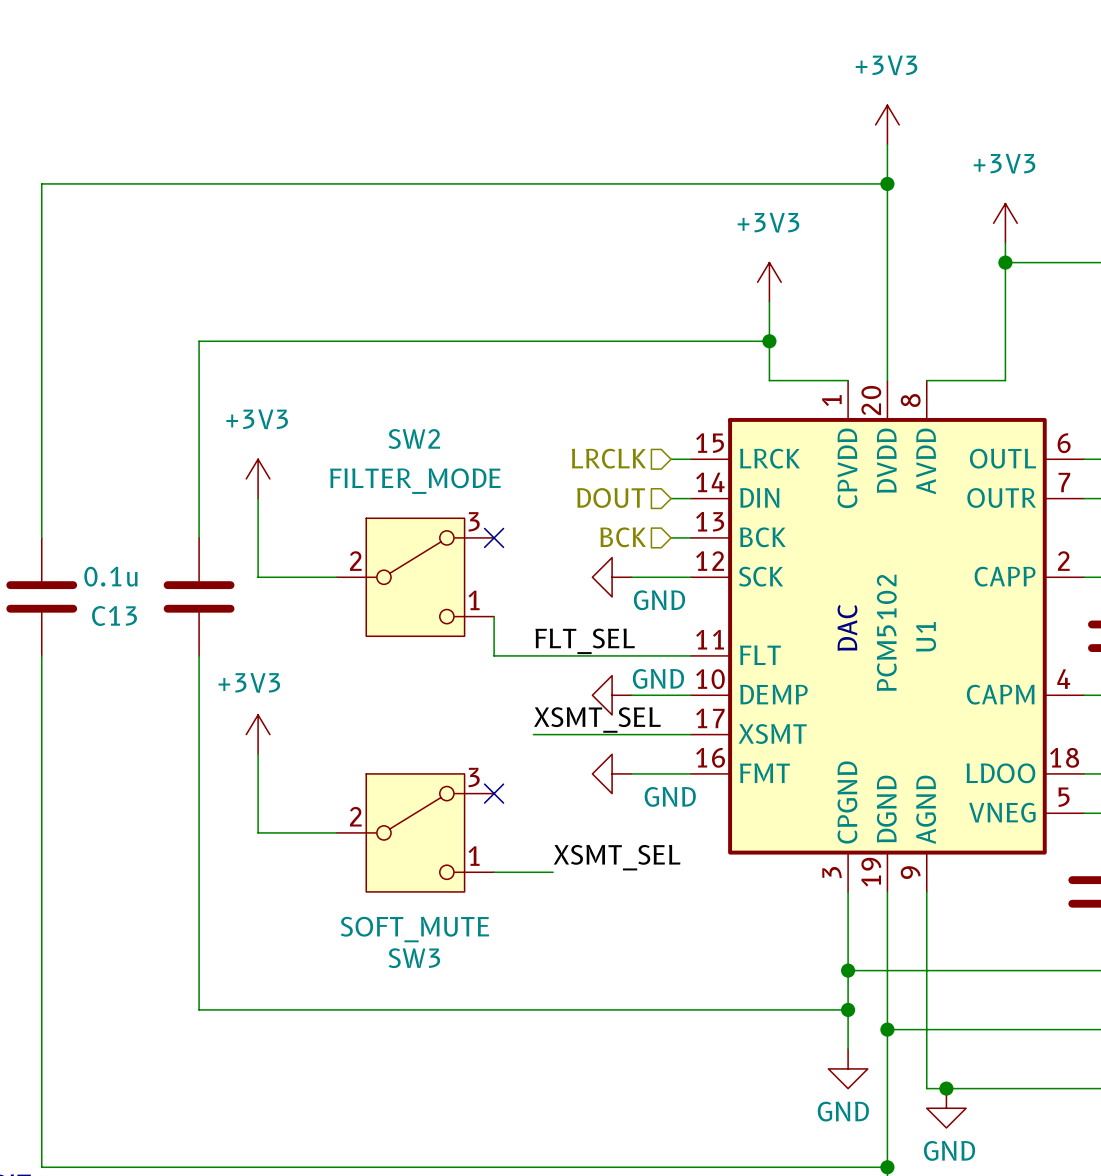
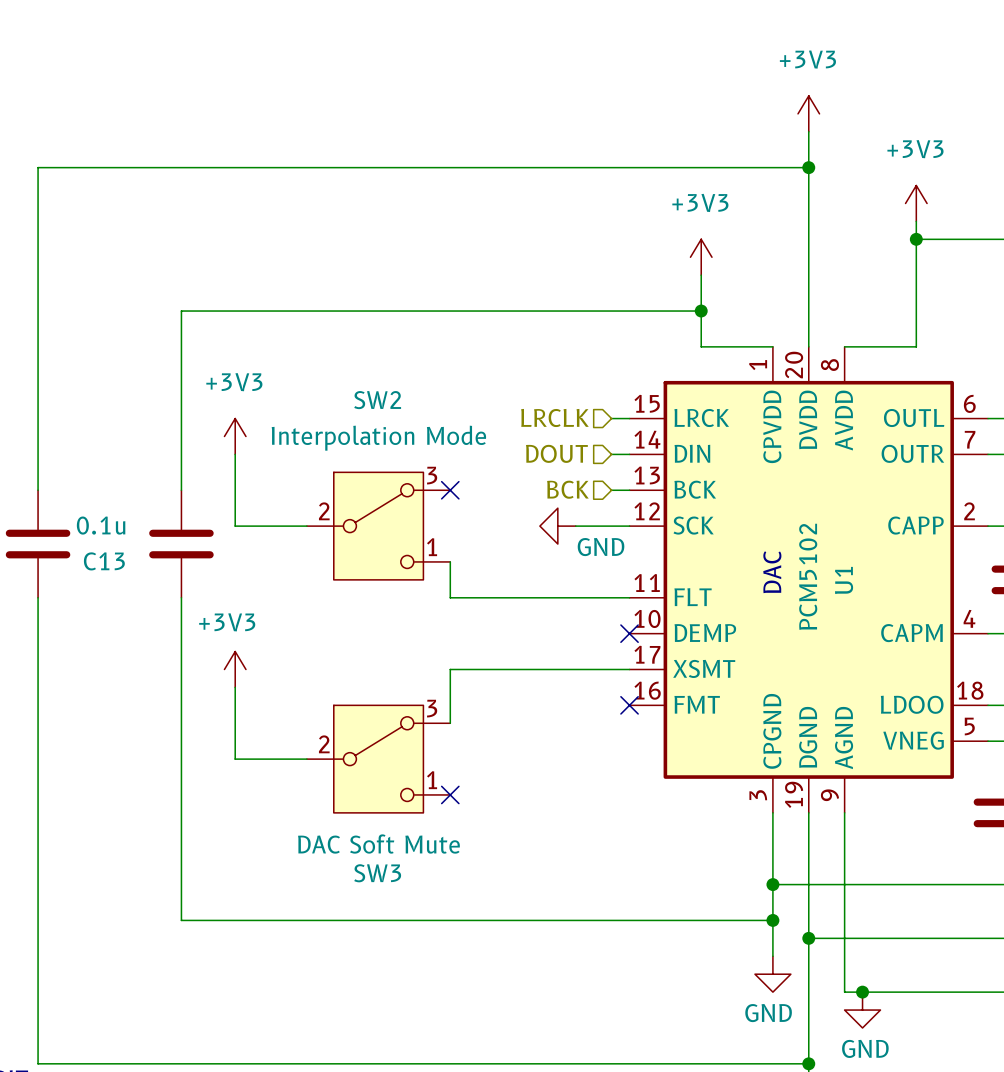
SW2 value: FILTER_MODE (415, 481) -> Interpolation Mode (378, 438)
label: FLT_SEL (585, 641) -> none
power symbol: GND (612, 695) -> none
wire: (631, 695) (690, 695) -> none
no-connect mark: none -> (629, 633)
label: XSMT_SEL (597, 719) -> none
wire: none -> (486, 669) (450, 669) (450, 723)
power symbol: GND (612, 773) -> none
wire: (631, 773) (690, 773) -> none
no-connect mark: none -> (629, 705)
no-connect mark position: (494, 793) -> (450, 794)
label: XSMT_SEL (617, 857) -> none
wire: (494, 872) (553, 872) -> none
SW3 value: SOFT_MUTE (414, 929) -> DAC Soft Mute (378, 844)

